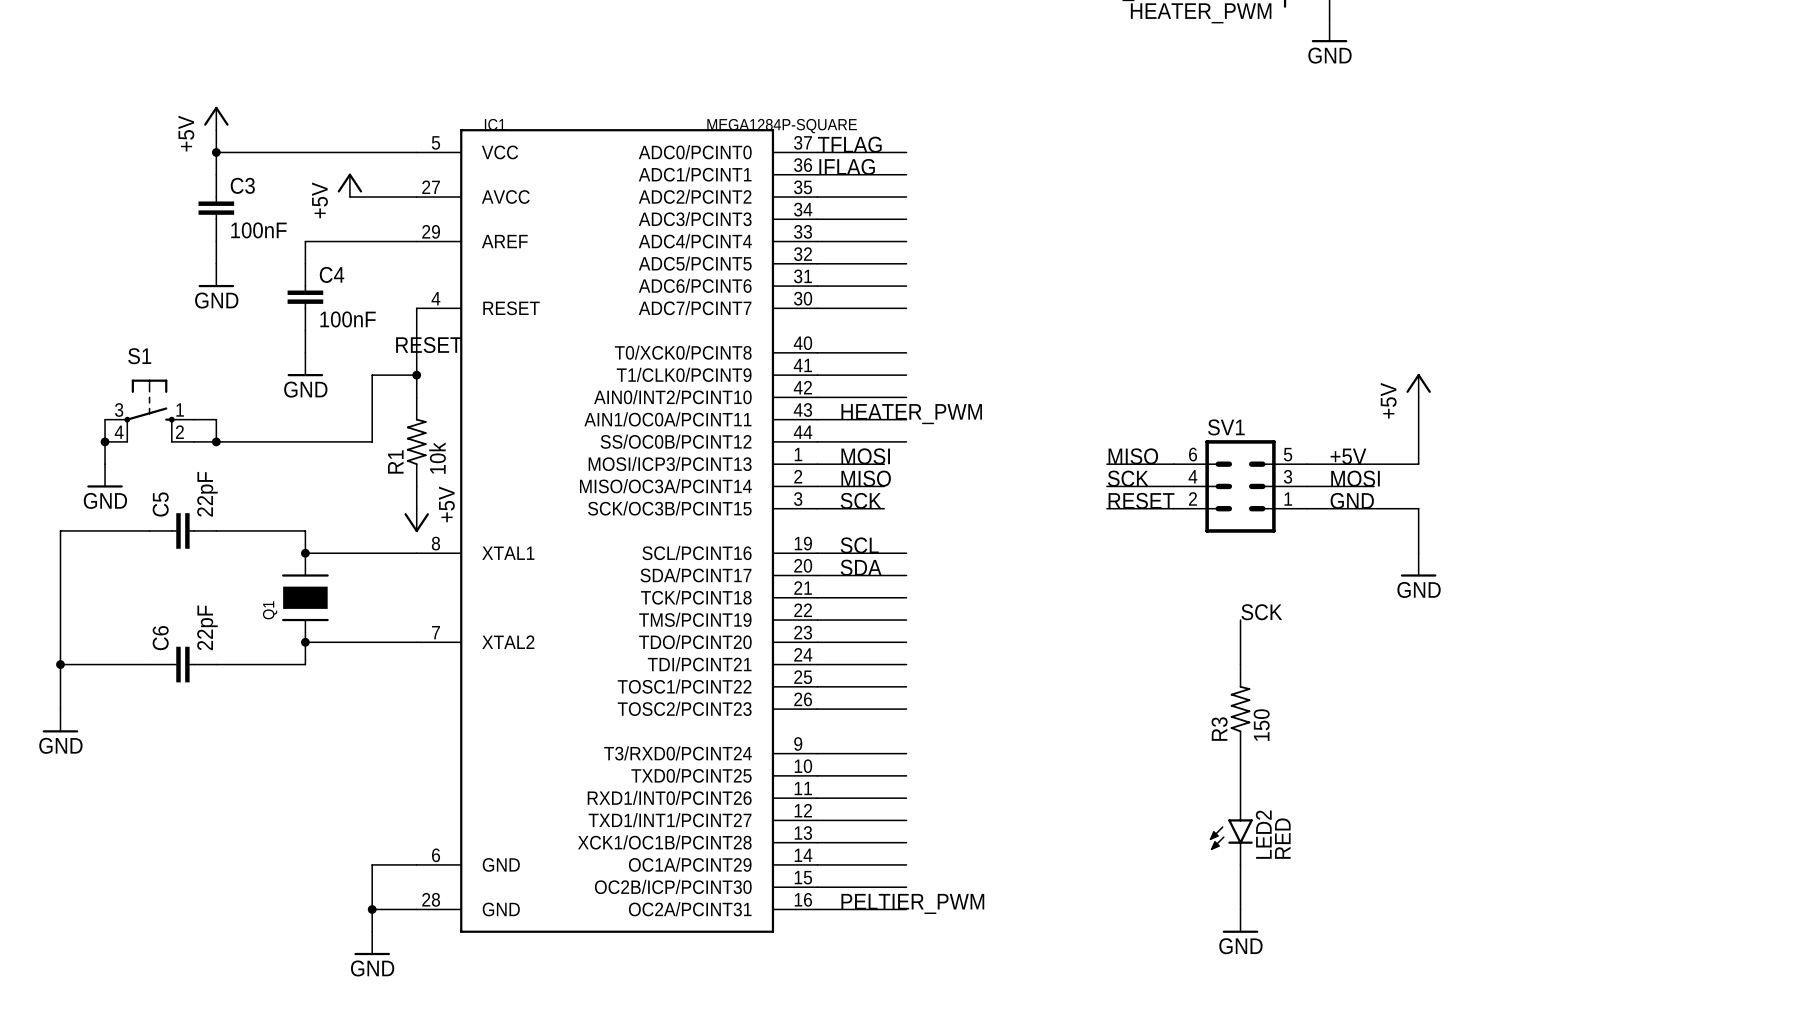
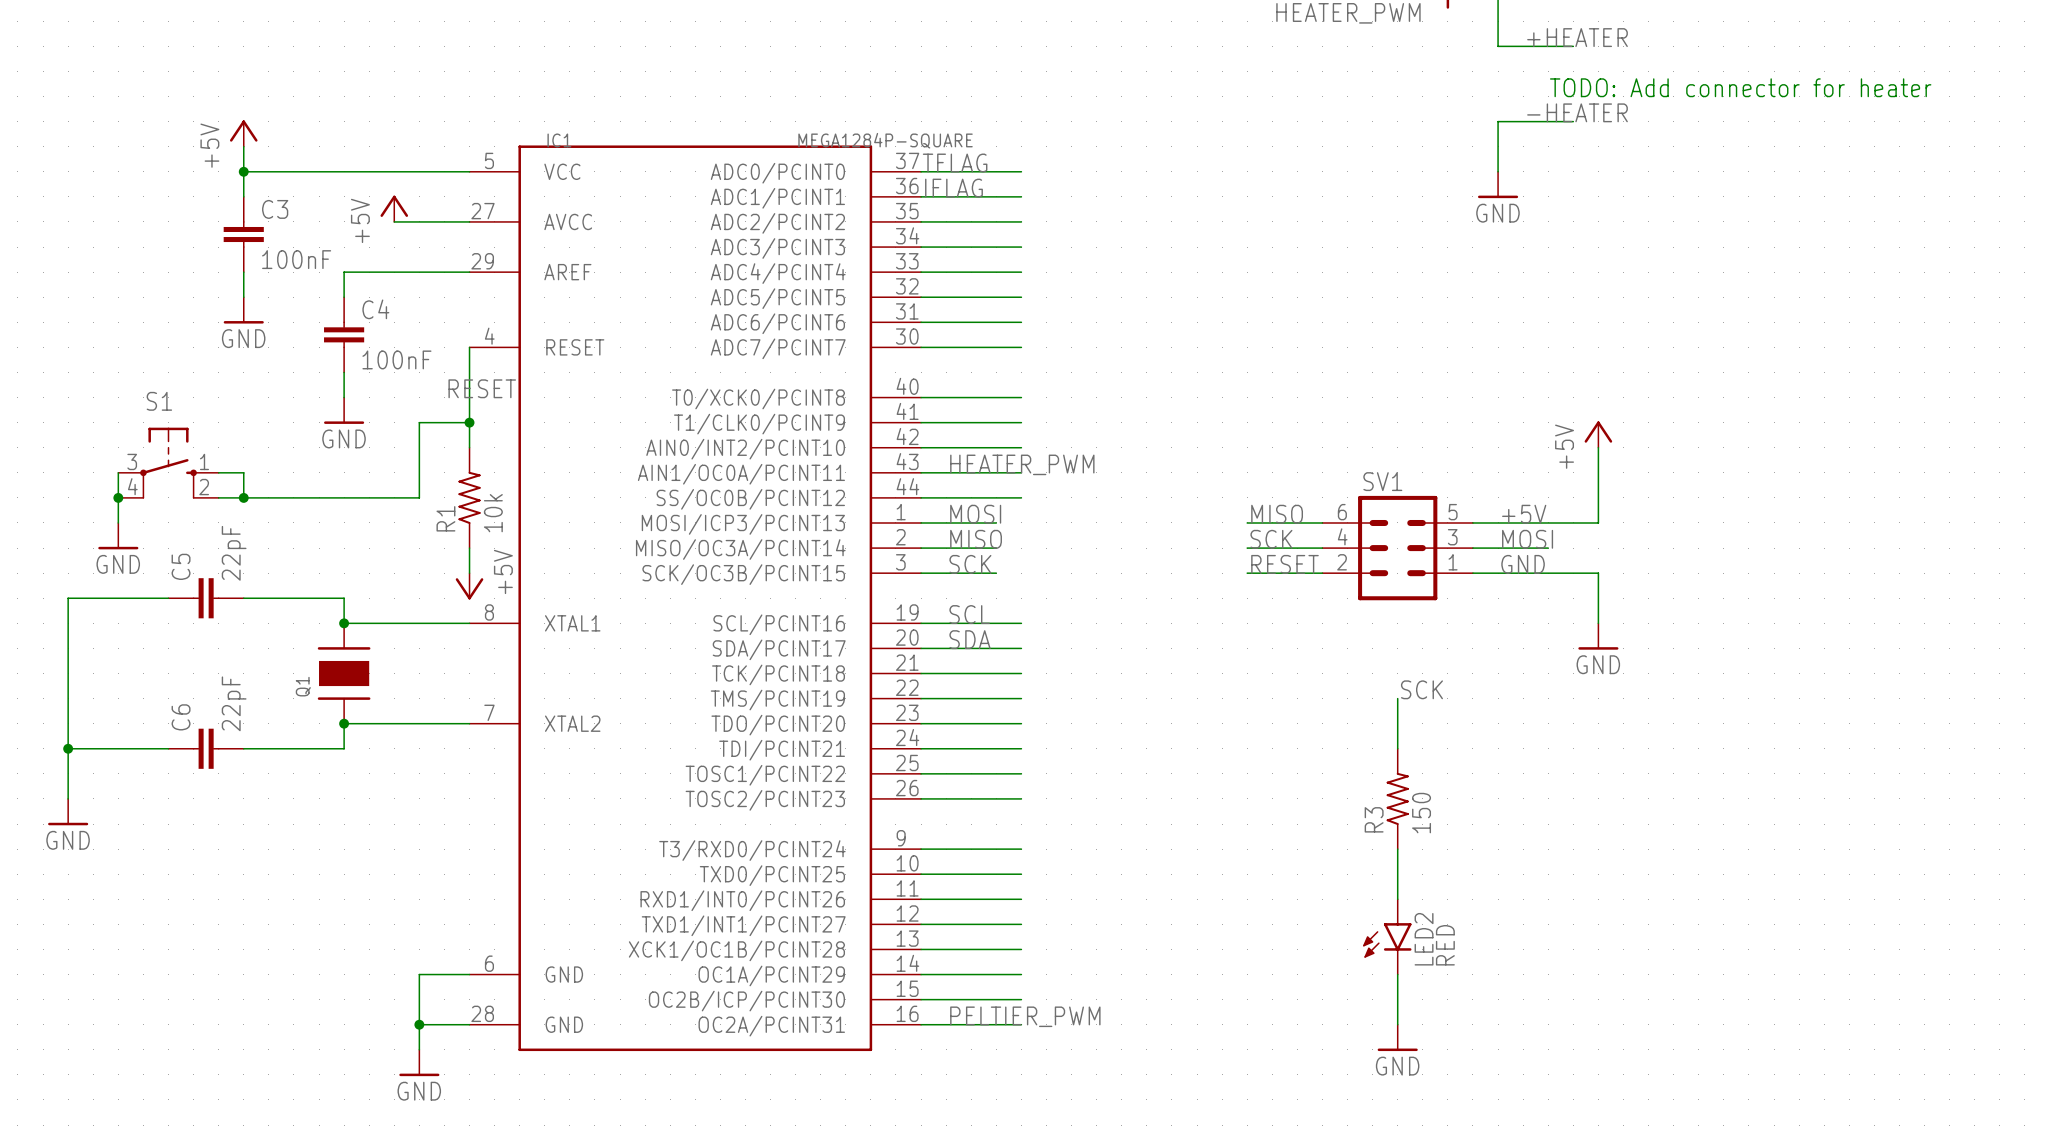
wire: none -> (1498, 21) (1498, 46) (1573, 46)
power symbol position: GND (1329, 30) -> GND (1498, 184)
label: none -> +HEATER (1577, 37)
text: none -> TODO: Add connector for heater (1740, 87)
label: none -> -HEATER (1577, 112)
wire: none -> (1573, 121) (1498, 121) (1498, 171)

